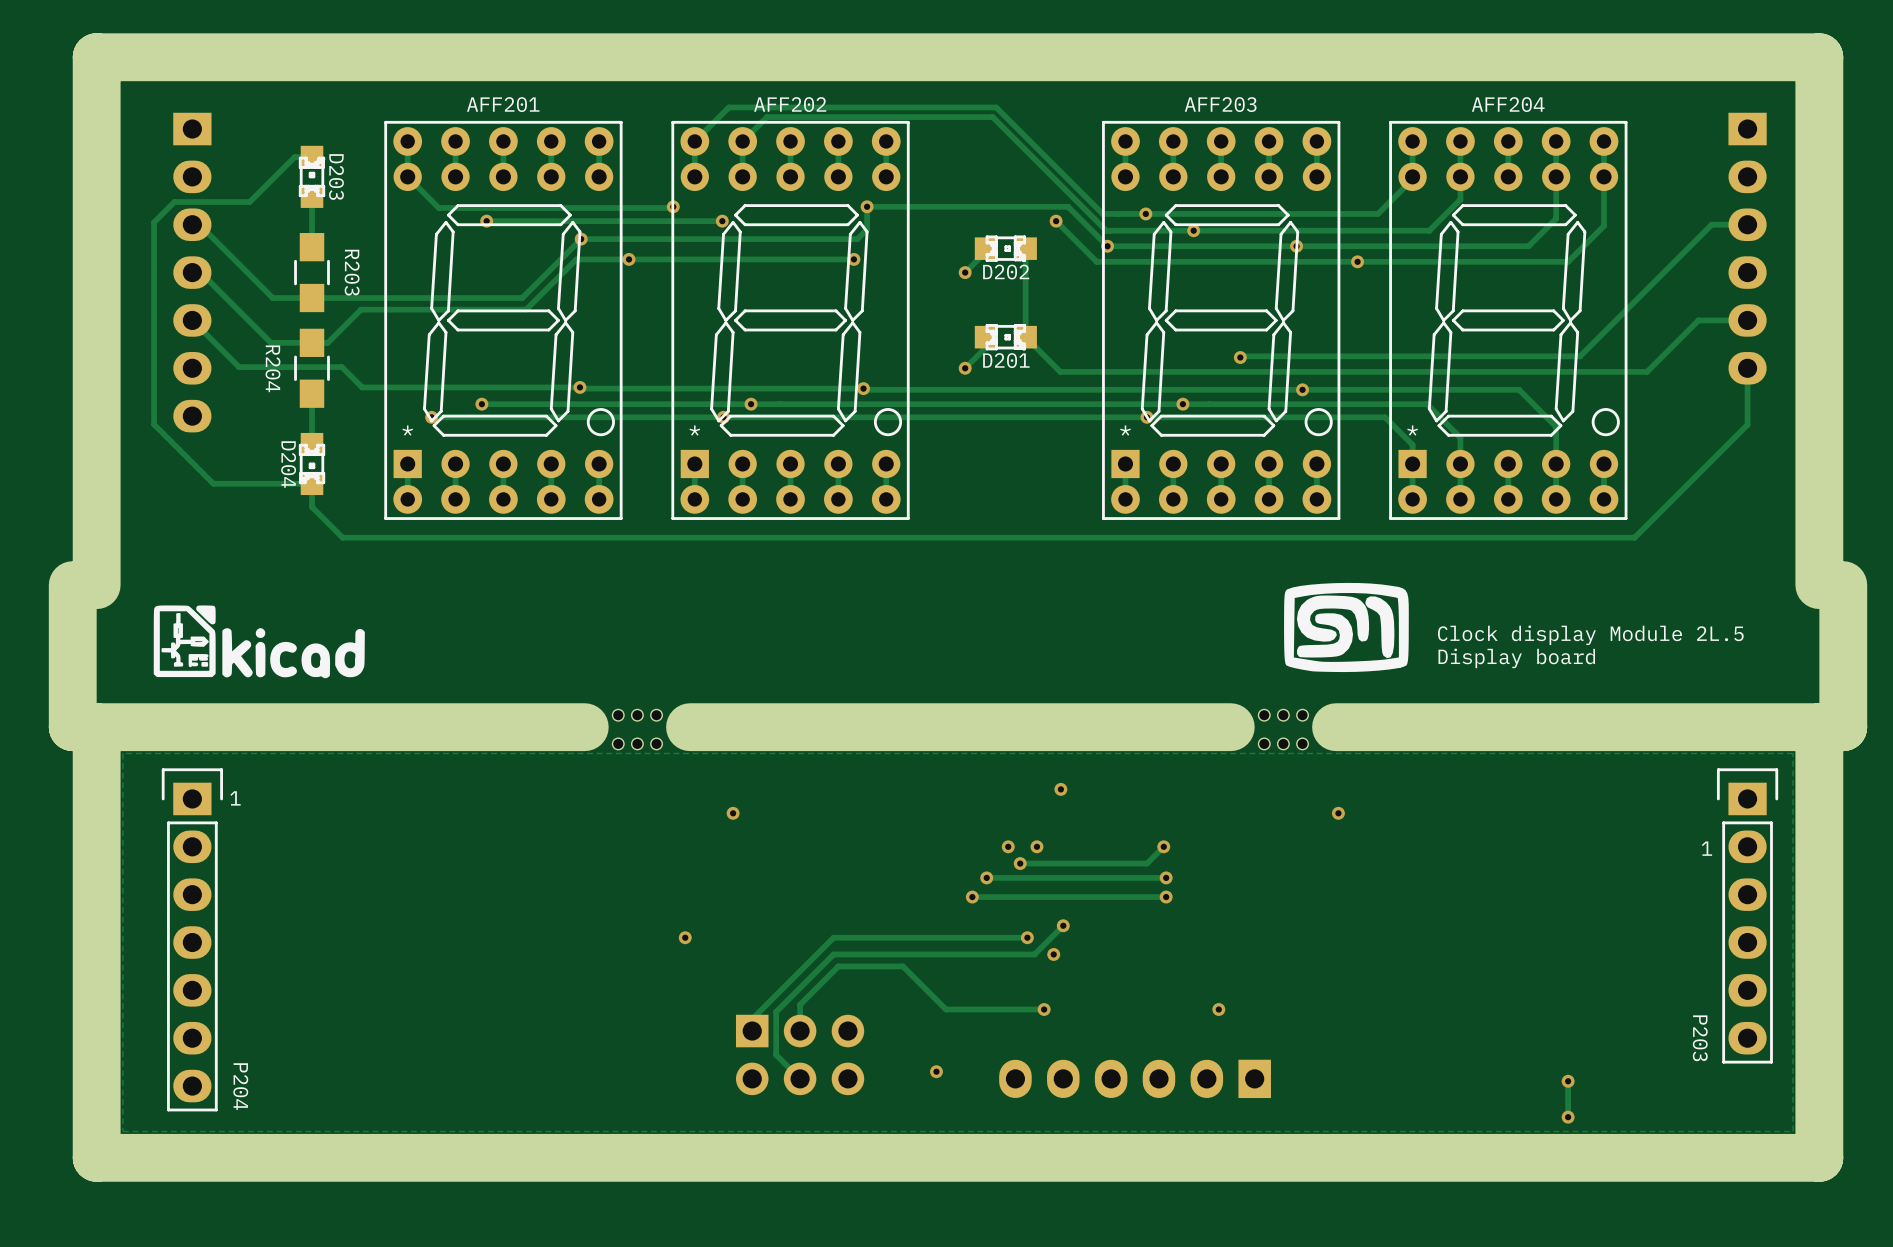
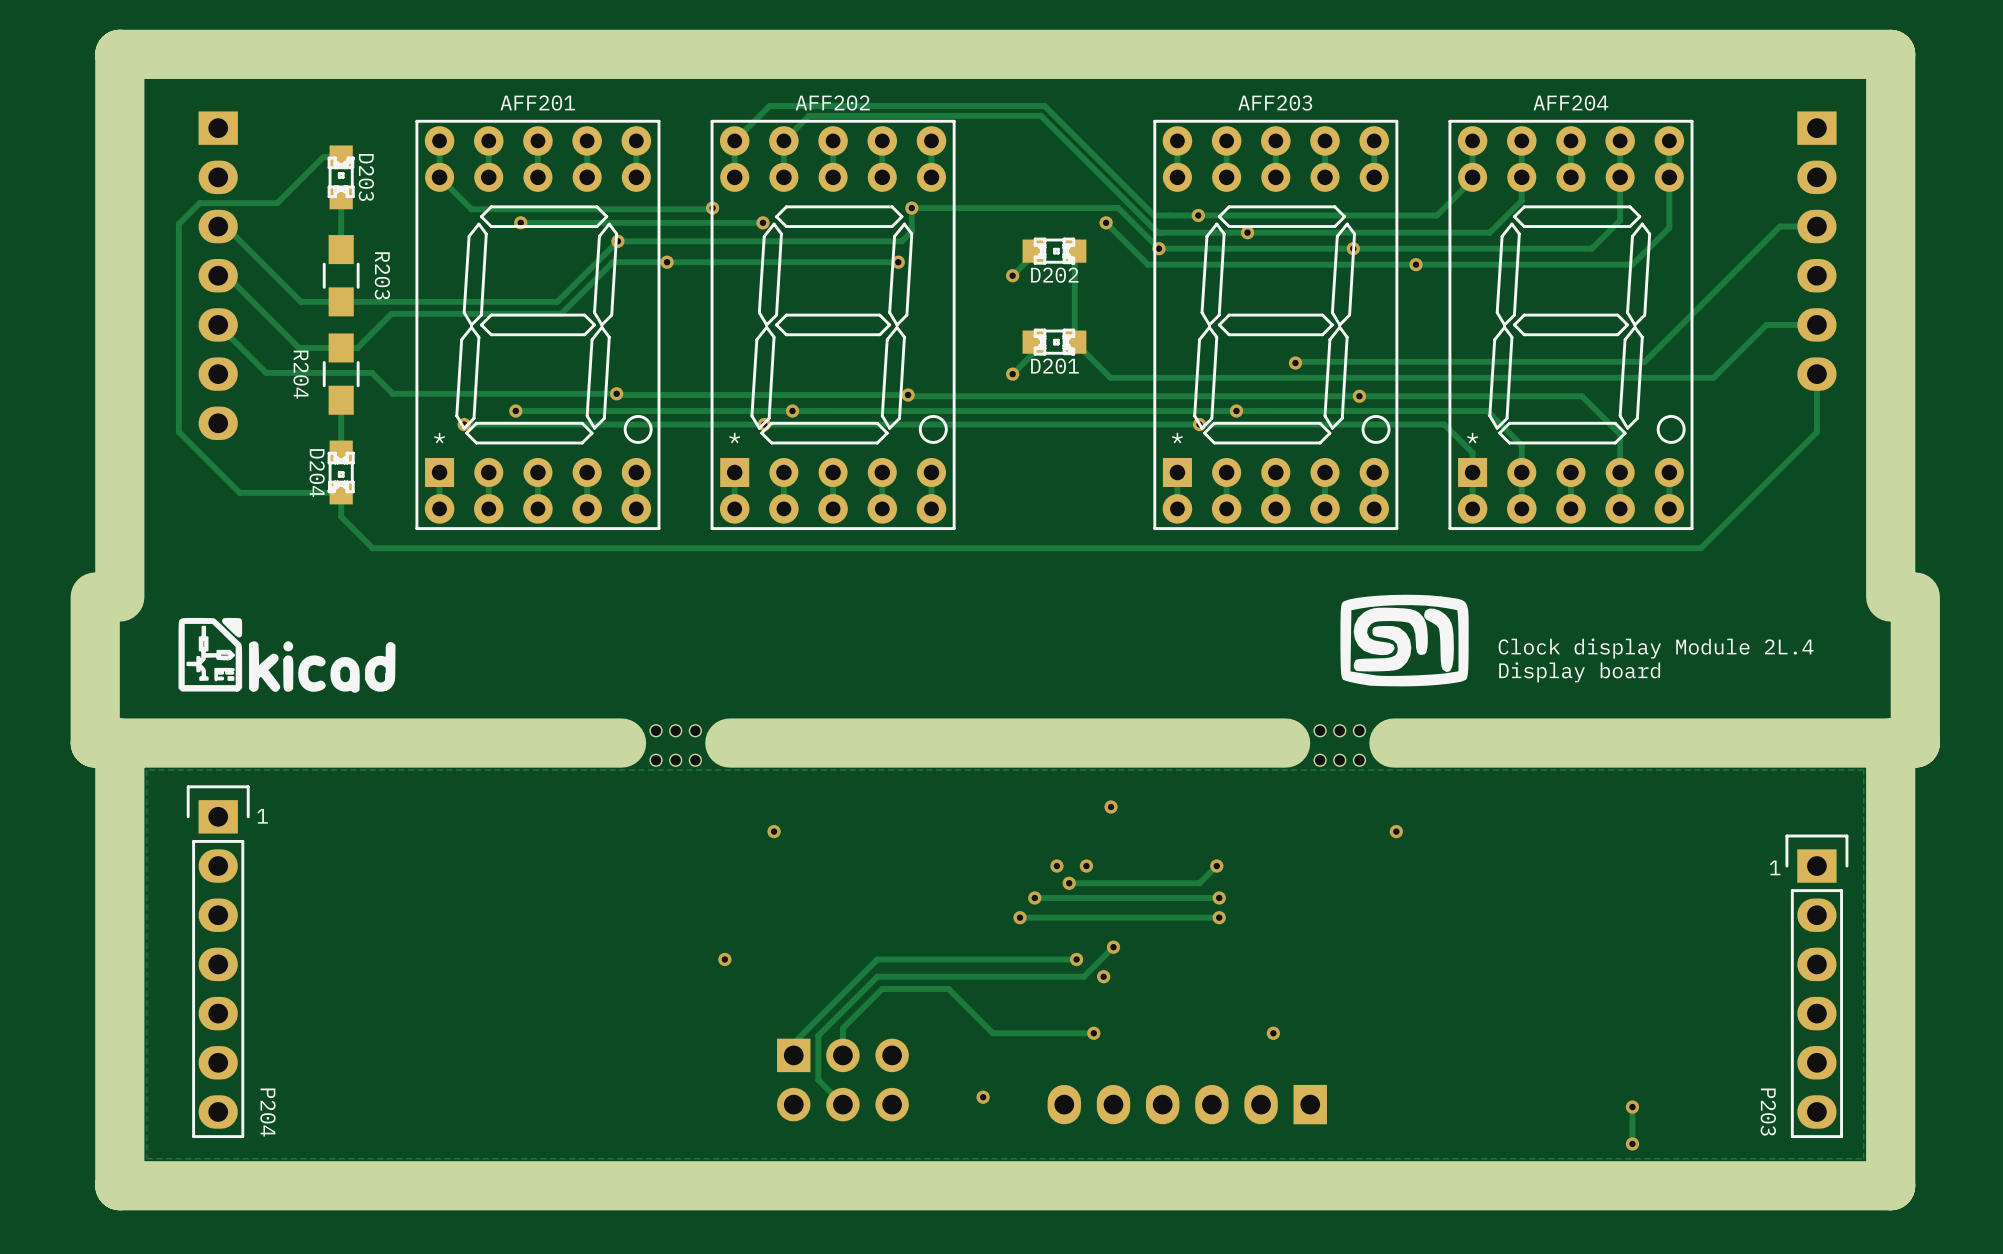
text: Clock display Module 2L.5 (1590, 635) -> Clock display Module 2L.4 (1656, 648)
P203 position: (1747, 915) -> (1816, 986)

